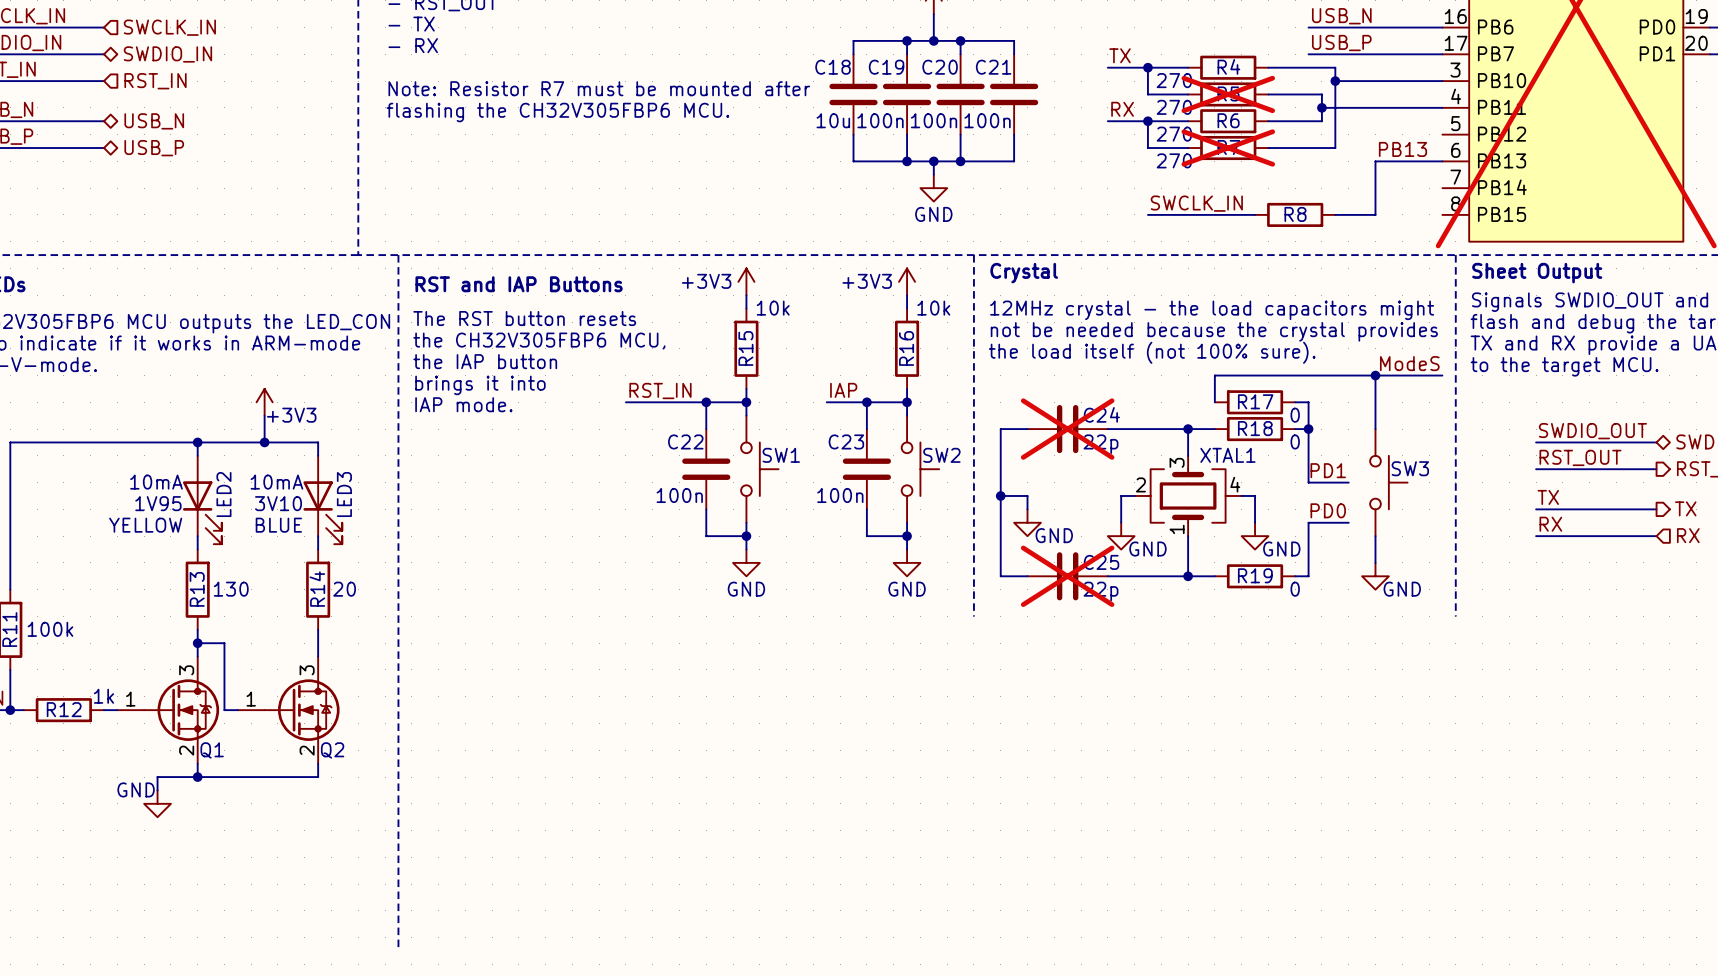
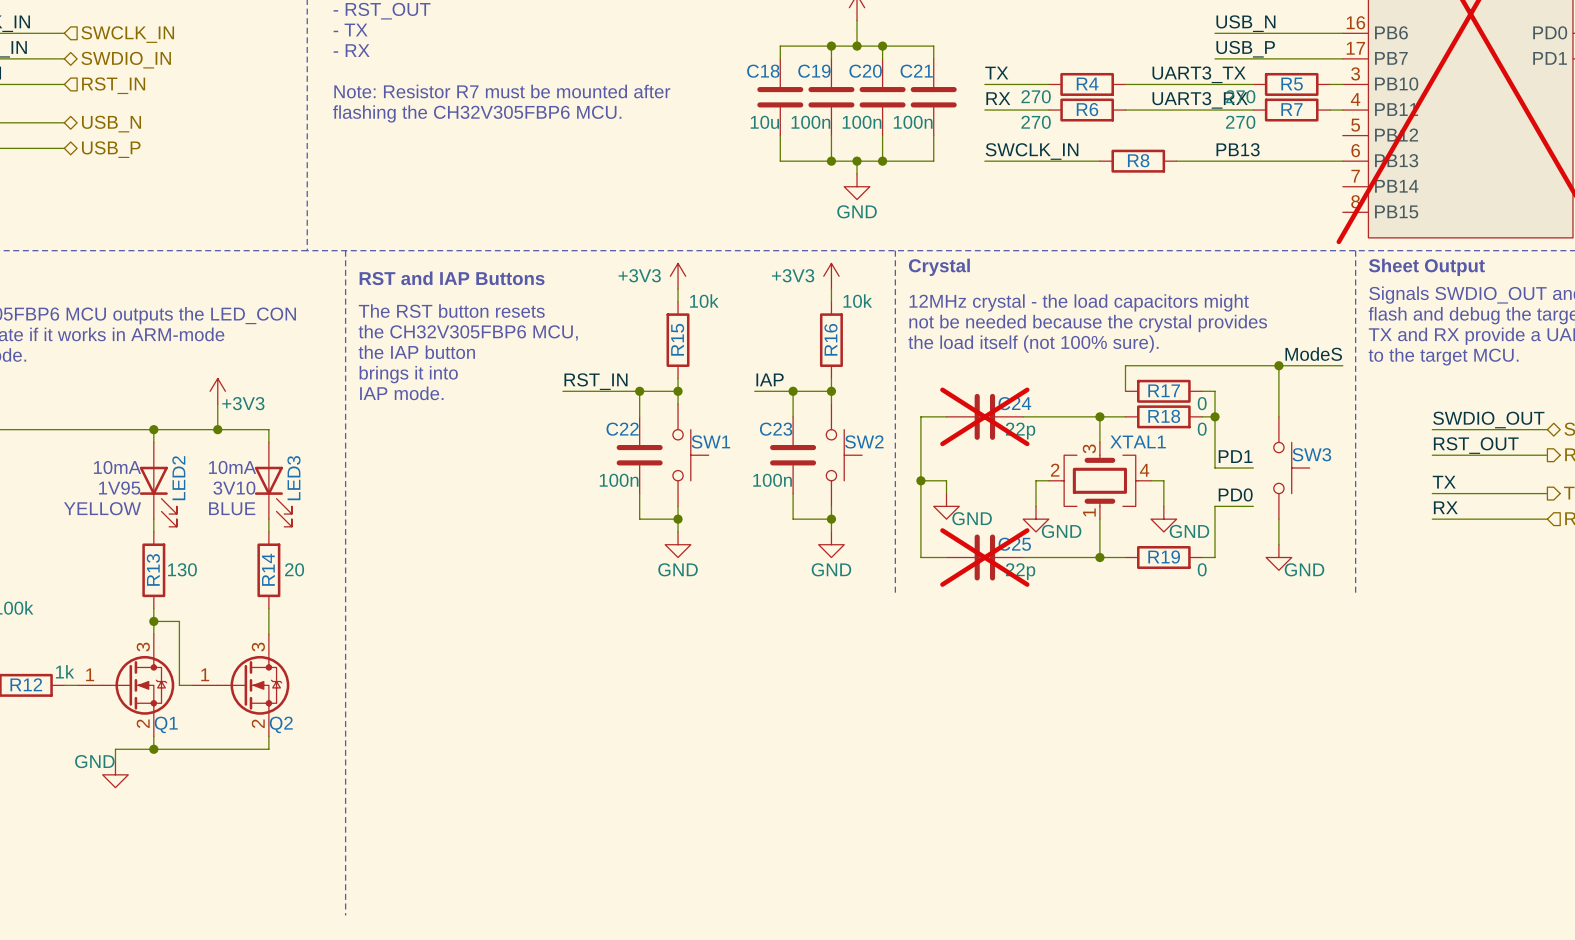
label position: TX (1120, 55) -> TX (996, 73)
wire: (1107, 67) (1188, 67) -> none
wire: (1147, 67) (1147, 94) (1188, 94) -> none
junction: (1147, 67) -> none
R4 position: (1228, 67) -> (1087, 84)
wire: (1268, 67) (1335, 67) (1335, 148) (1268, 148) -> none
label: none -> UART3_TX (1199, 74)
wire: none -> (984, 84) (1048, 84)
wire: none -> (1125, 84) (1240, 84)
junction: (1335, 81) -> none
wire: (1348, 81) (1429, 81) -> none
R5 position: (1228, 94) -> (1291, 84)
R5 do-not-place cross: (1228, 94) -> none
wire: (1268, 94) (1321, 94) (1321, 121) (1268, 121) -> none
label: none -> UART3_RX (1200, 100)
wire: none -> (984, 110) (1048, 110)
junction: (1321, 107) -> none
wire: (1348, 107) (1429, 107) -> none
label position: RX (1122, 109) -> RX (998, 98)
wire: (1107, 121) (1188, 121) -> none
wire: (1147, 121) (1147, 148) (1188, 148) -> none
junction: (1147, 121) -> none
R6 position: (1228, 121) -> (1087, 110)
R7 position: (1228, 148) -> (1291, 110)
R7 do-not-place cross: (1228, 148) -> none
label position: PB13 (1402, 149) -> PB13 (1238, 149)
wire: none -> (984, 161) (1099, 161)
wire: (1375, 161) (1375, 214) (1335, 214) -> (1278, 161) (1176, 161)
label position: SWCLK_IN (1196, 203) -> SWCLK_IN (1032, 151)
wire: (1147, 214) (1255, 214) -> (1125, 110) (1227, 110)
R8 position: (1295, 214) -> (1138, 161)

